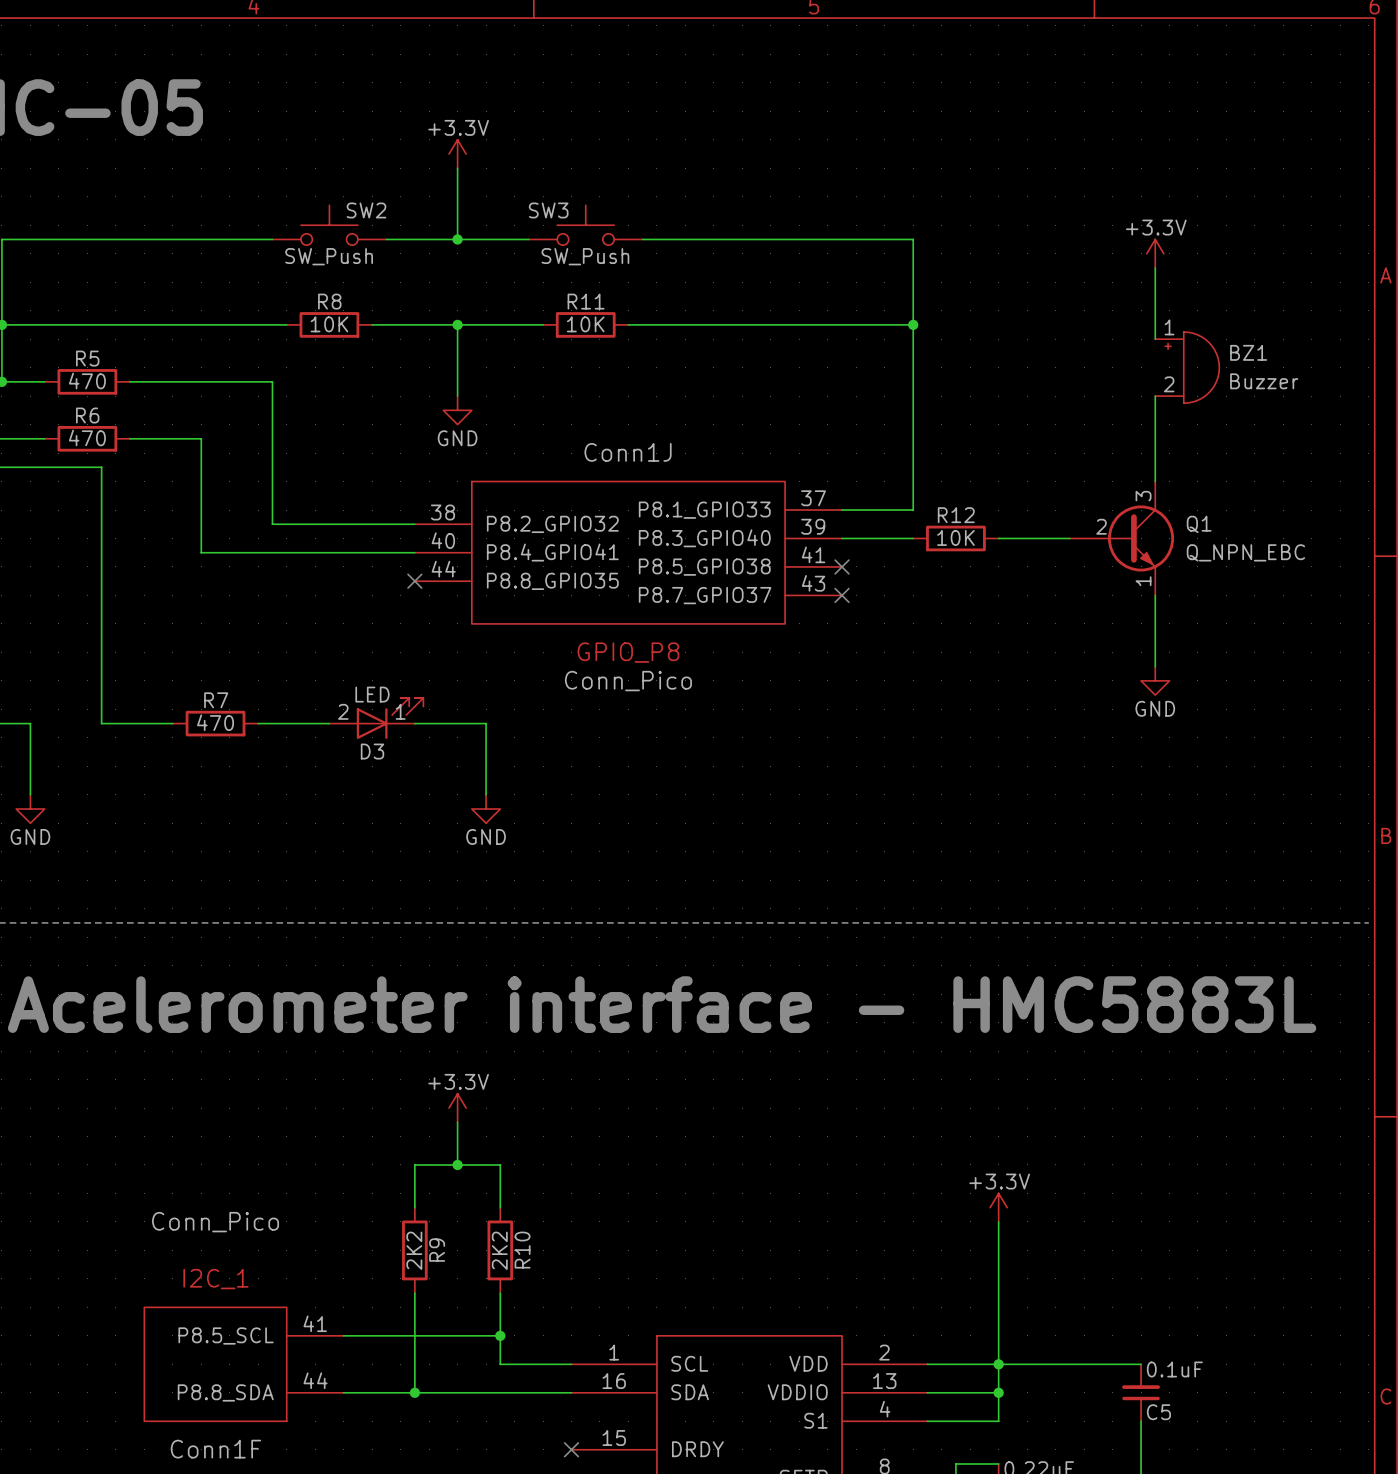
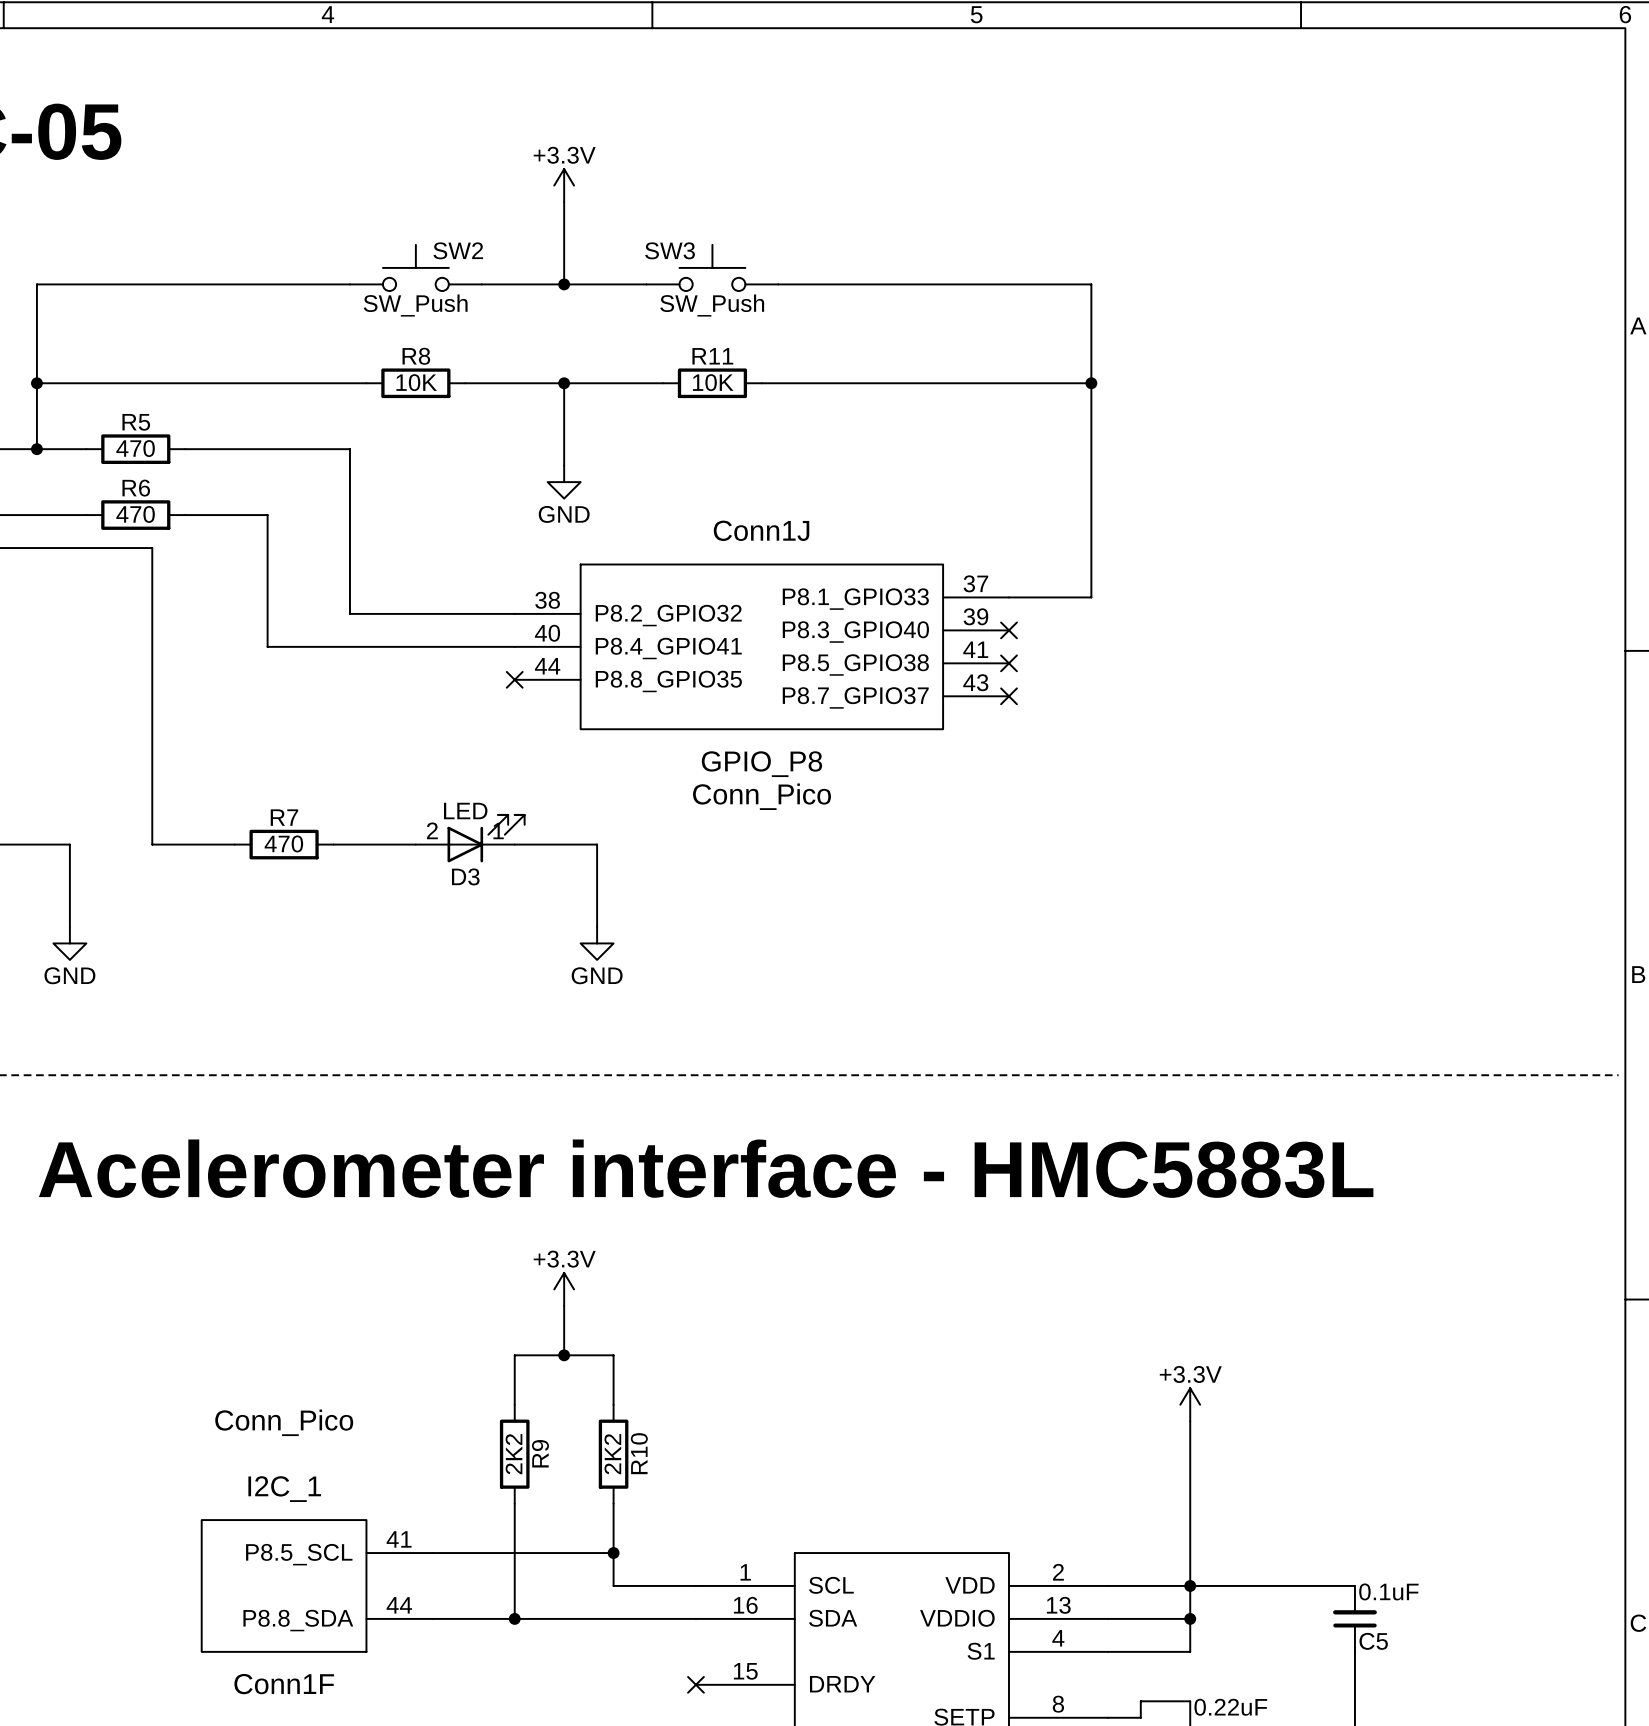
power symbol: +3.3V (1155, 253) -> none
wire: (1155, 267) (1155, 339) -> none
BZ1: Buzzer (1187, 367) -> none
wire: (1155, 396) (1155, 481) -> none
wire: (842, 538) (913, 538) -> none
no-connect mark: none -> (1009, 630)
R12: 10K (955, 538) -> none
wire: (998, 538) (1069, 538) -> none
Q1: Q_NPN_EBC (1121, 538) -> none
wire: (1155, 595) (1155, 666) -> none
power symbol: GND (1155, 680) -> none

